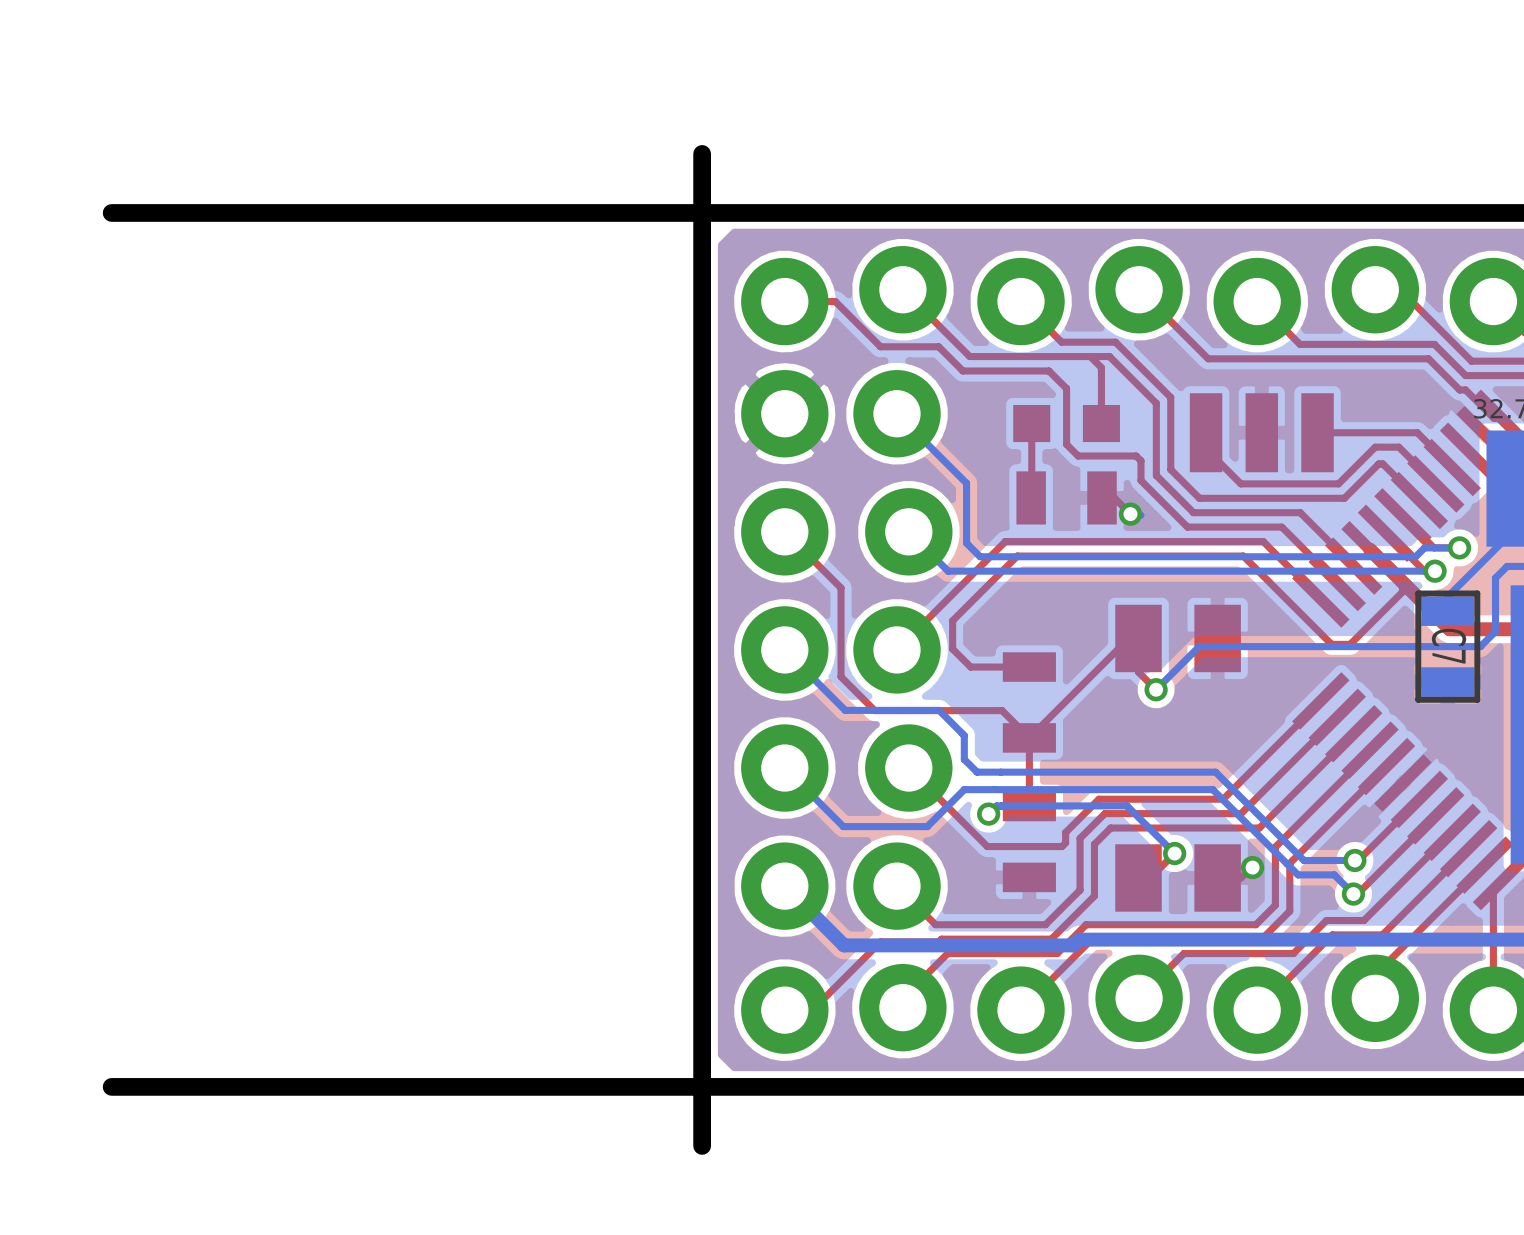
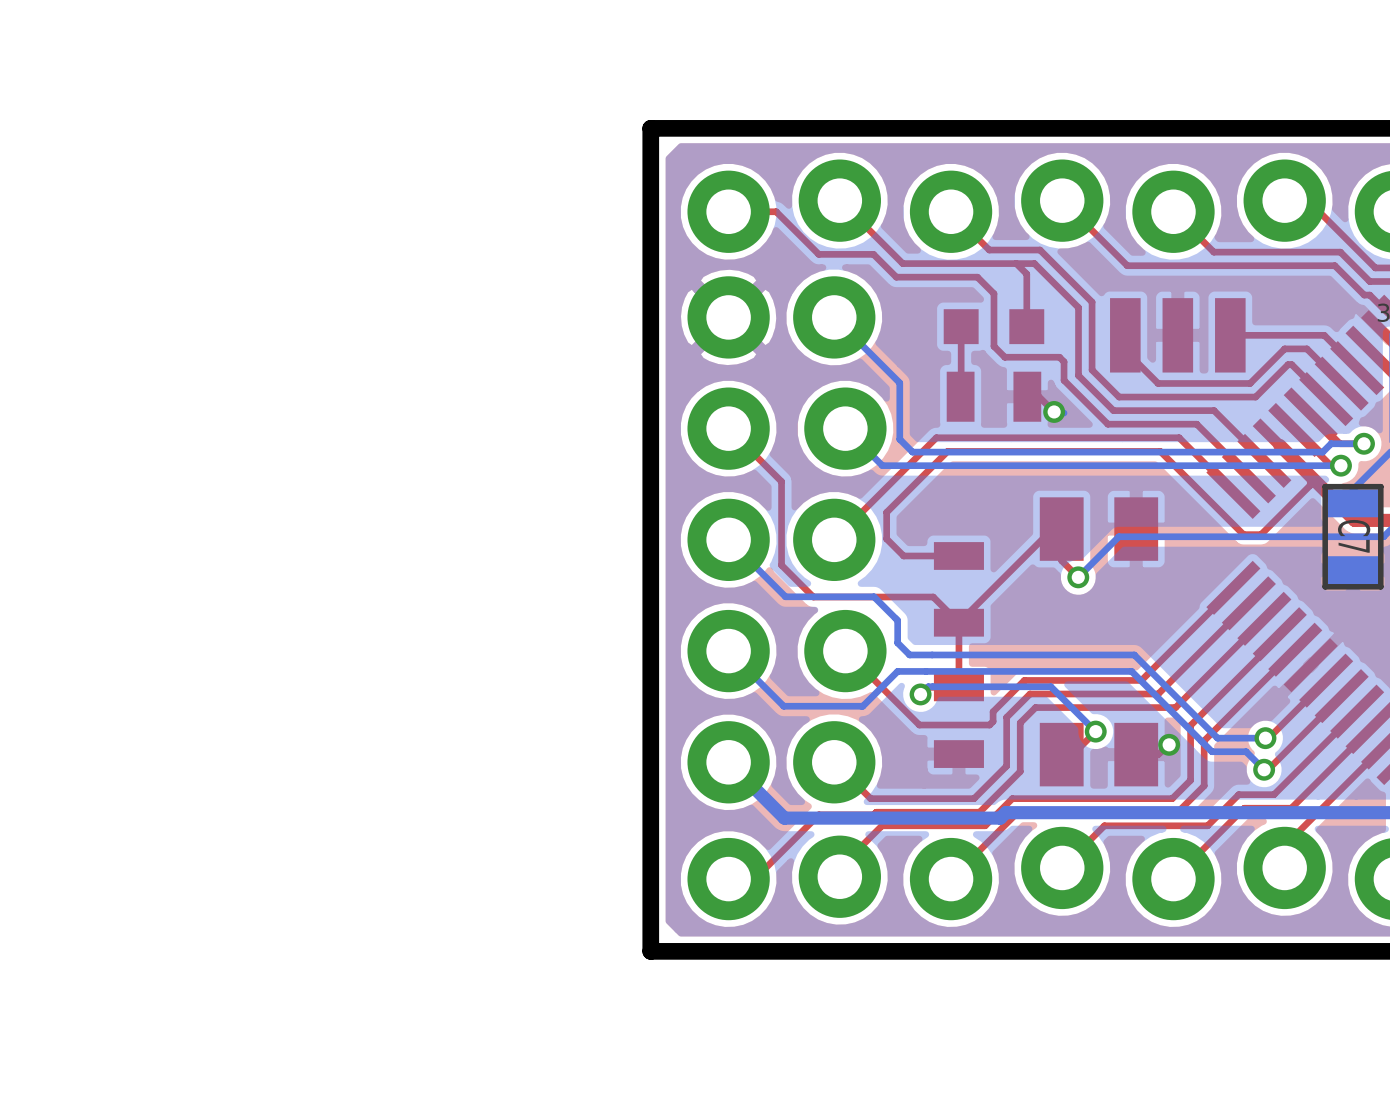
board edge: (702, 153) (702, 212) (111, 212) -> none
board edge: (111, 1086) (702, 1086) (702, 1145) -> none

